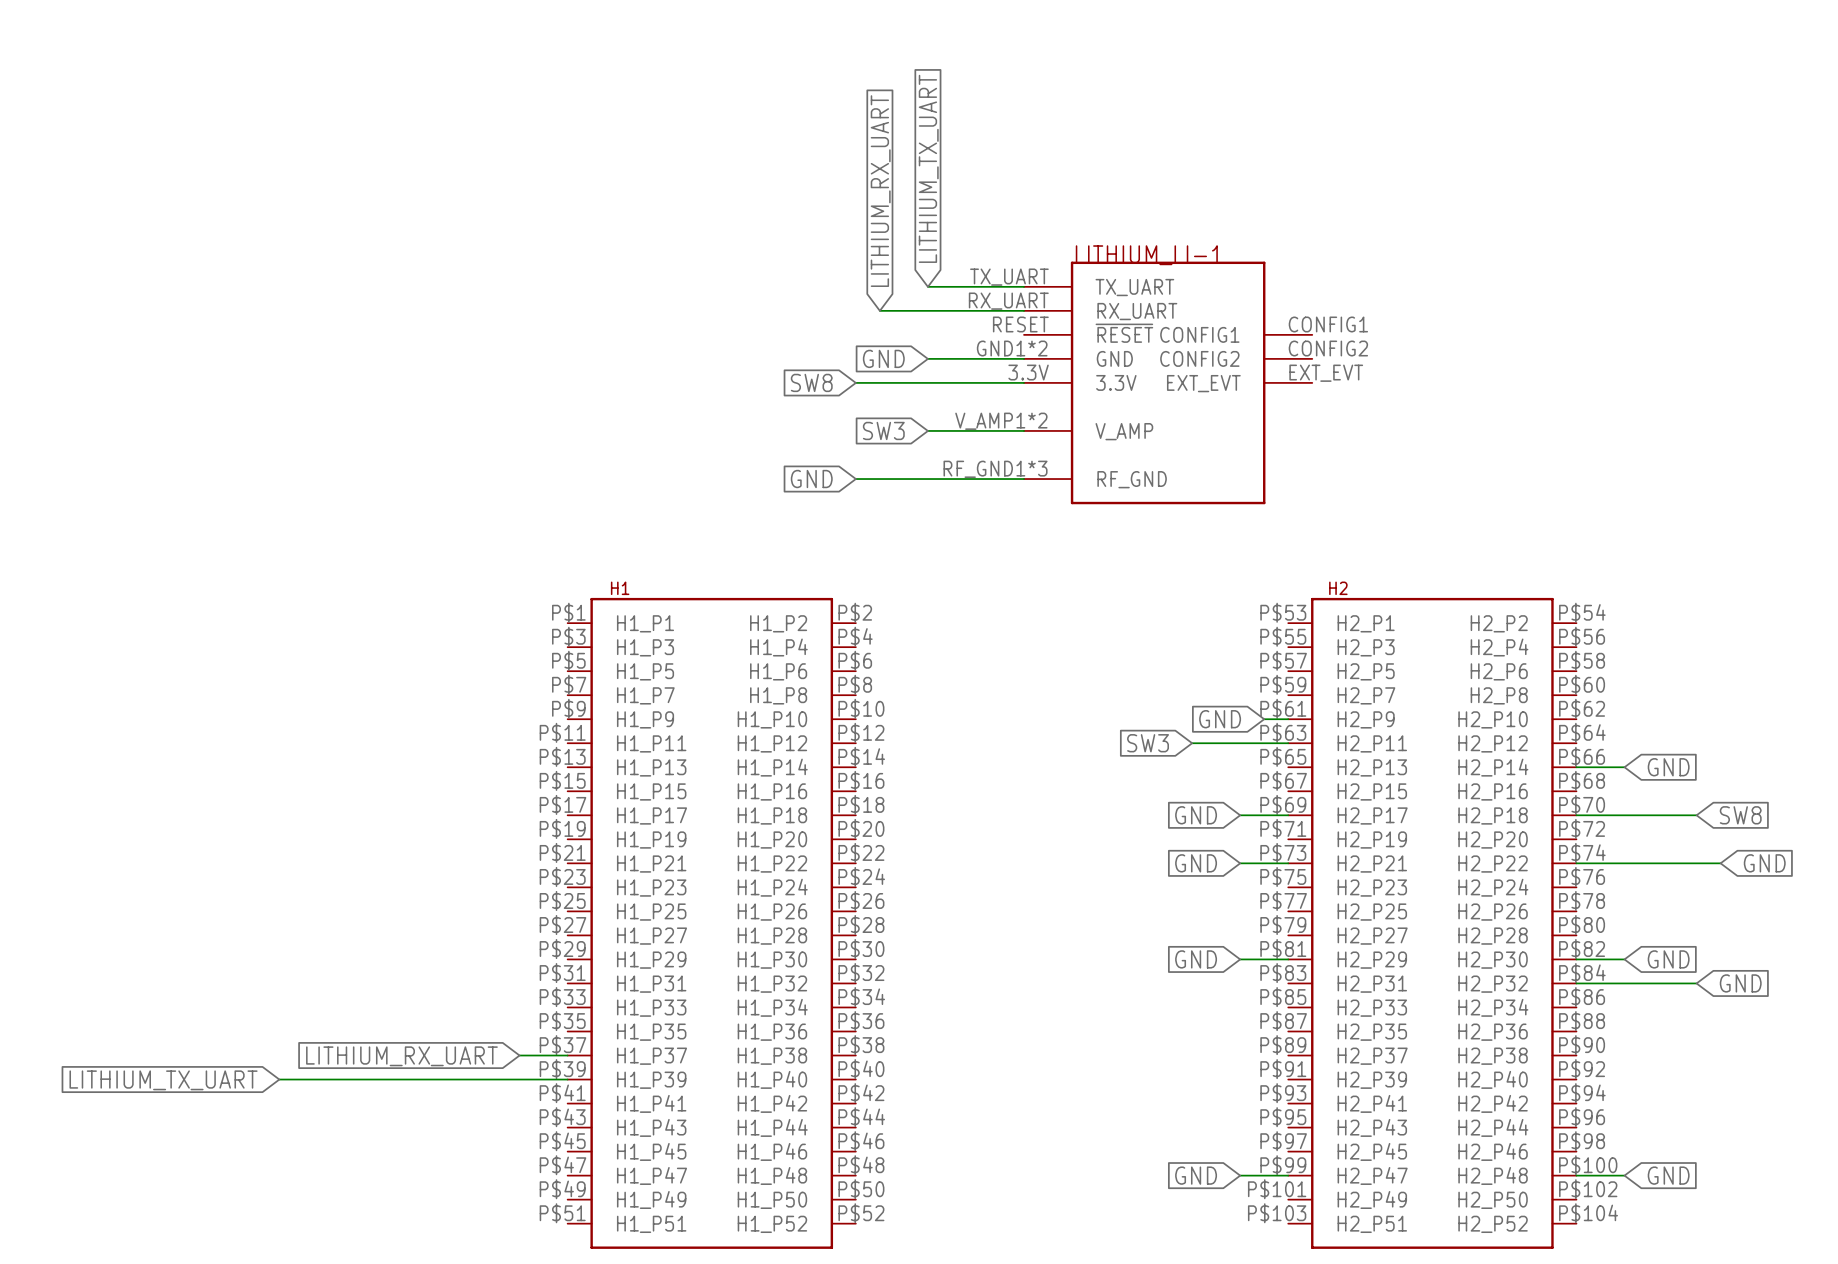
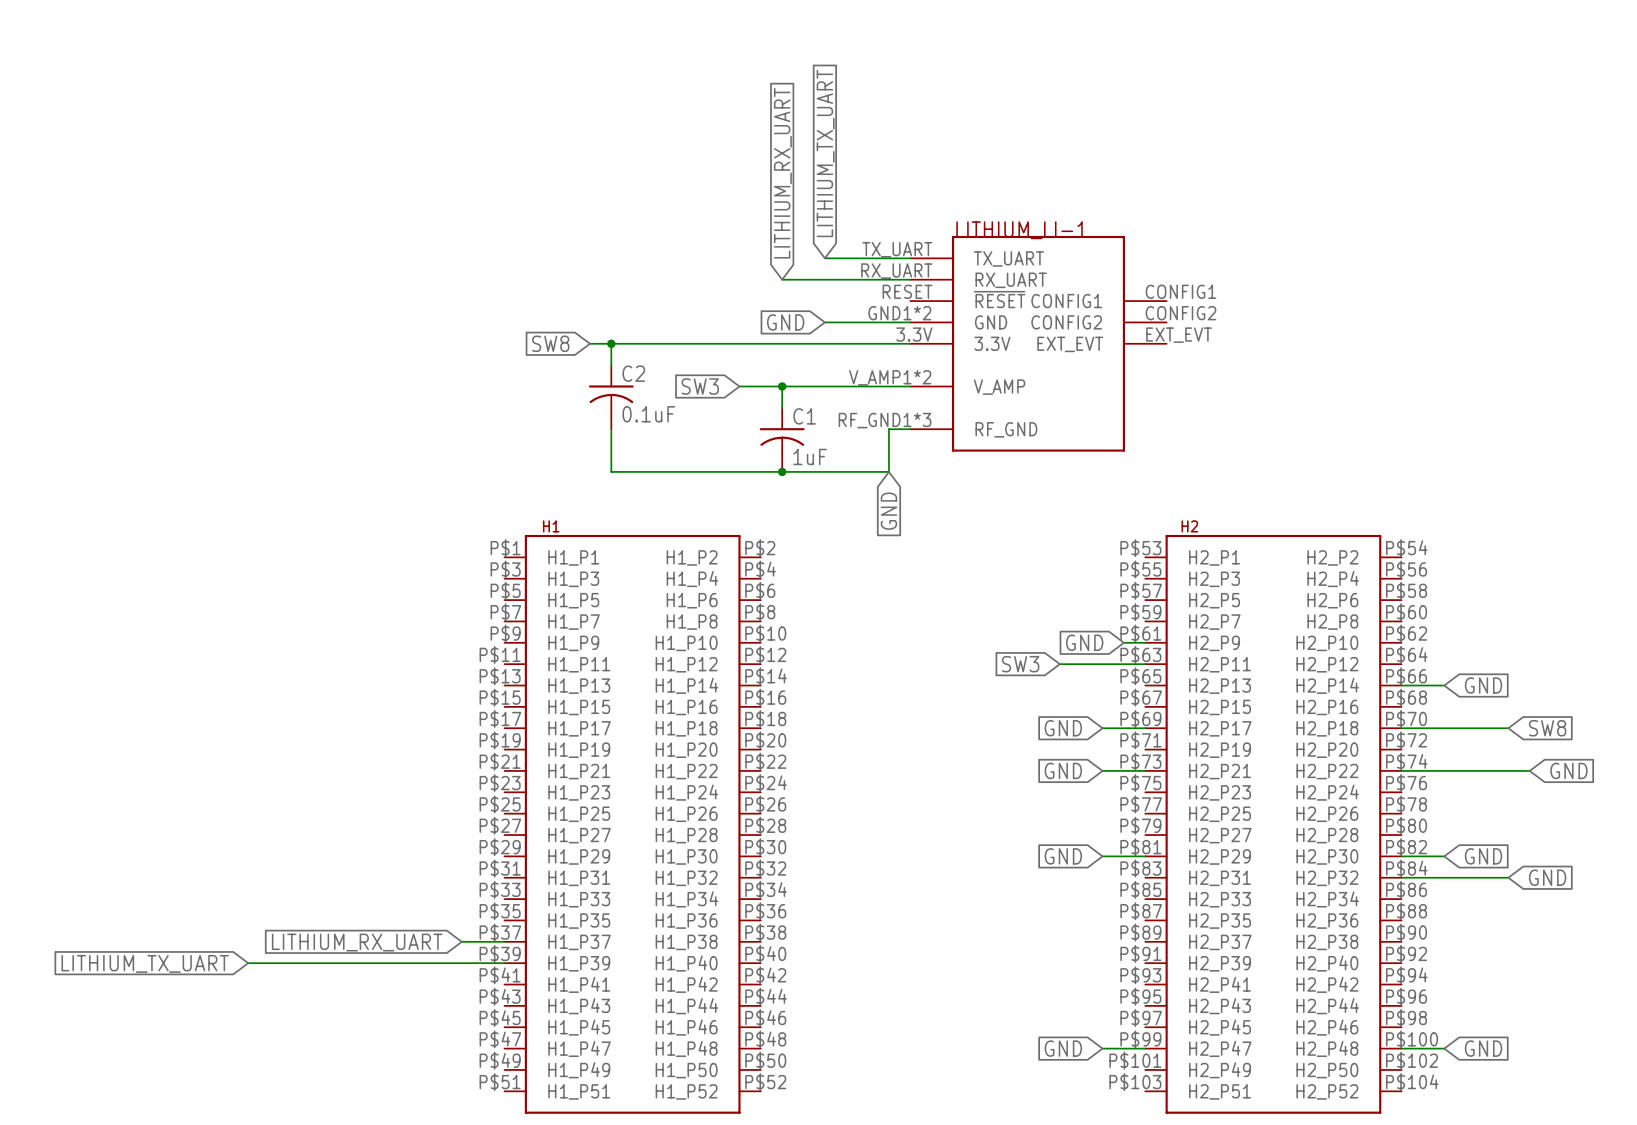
wire: none -> (589, 343) (760, 343)
wire: none -> (611, 343) (611, 365)
junction: none -> (611, 343)
global label position: SW8 (811, 382) -> SW8 (550, 343)
wire: none -> (739, 386) (824, 386)
wire: none -> (782, 386) (782, 407)
junction: none -> (782, 386)
global label position: SW3 (883, 430) -> SW3 (700, 386)
C2: none -> 0.1uF (611, 397)
global label rotation: 0° (811, 479) -> 90° counterclockwise (888, 511)
global label position: GND (811, 479) -> GND (888, 511)
wire: (855, 479) (999, 479) -> (611, 429) (611, 471) (888, 471) (888, 429)
C1: none -> 1uF (782, 439)
junction: none -> (782, 471)

